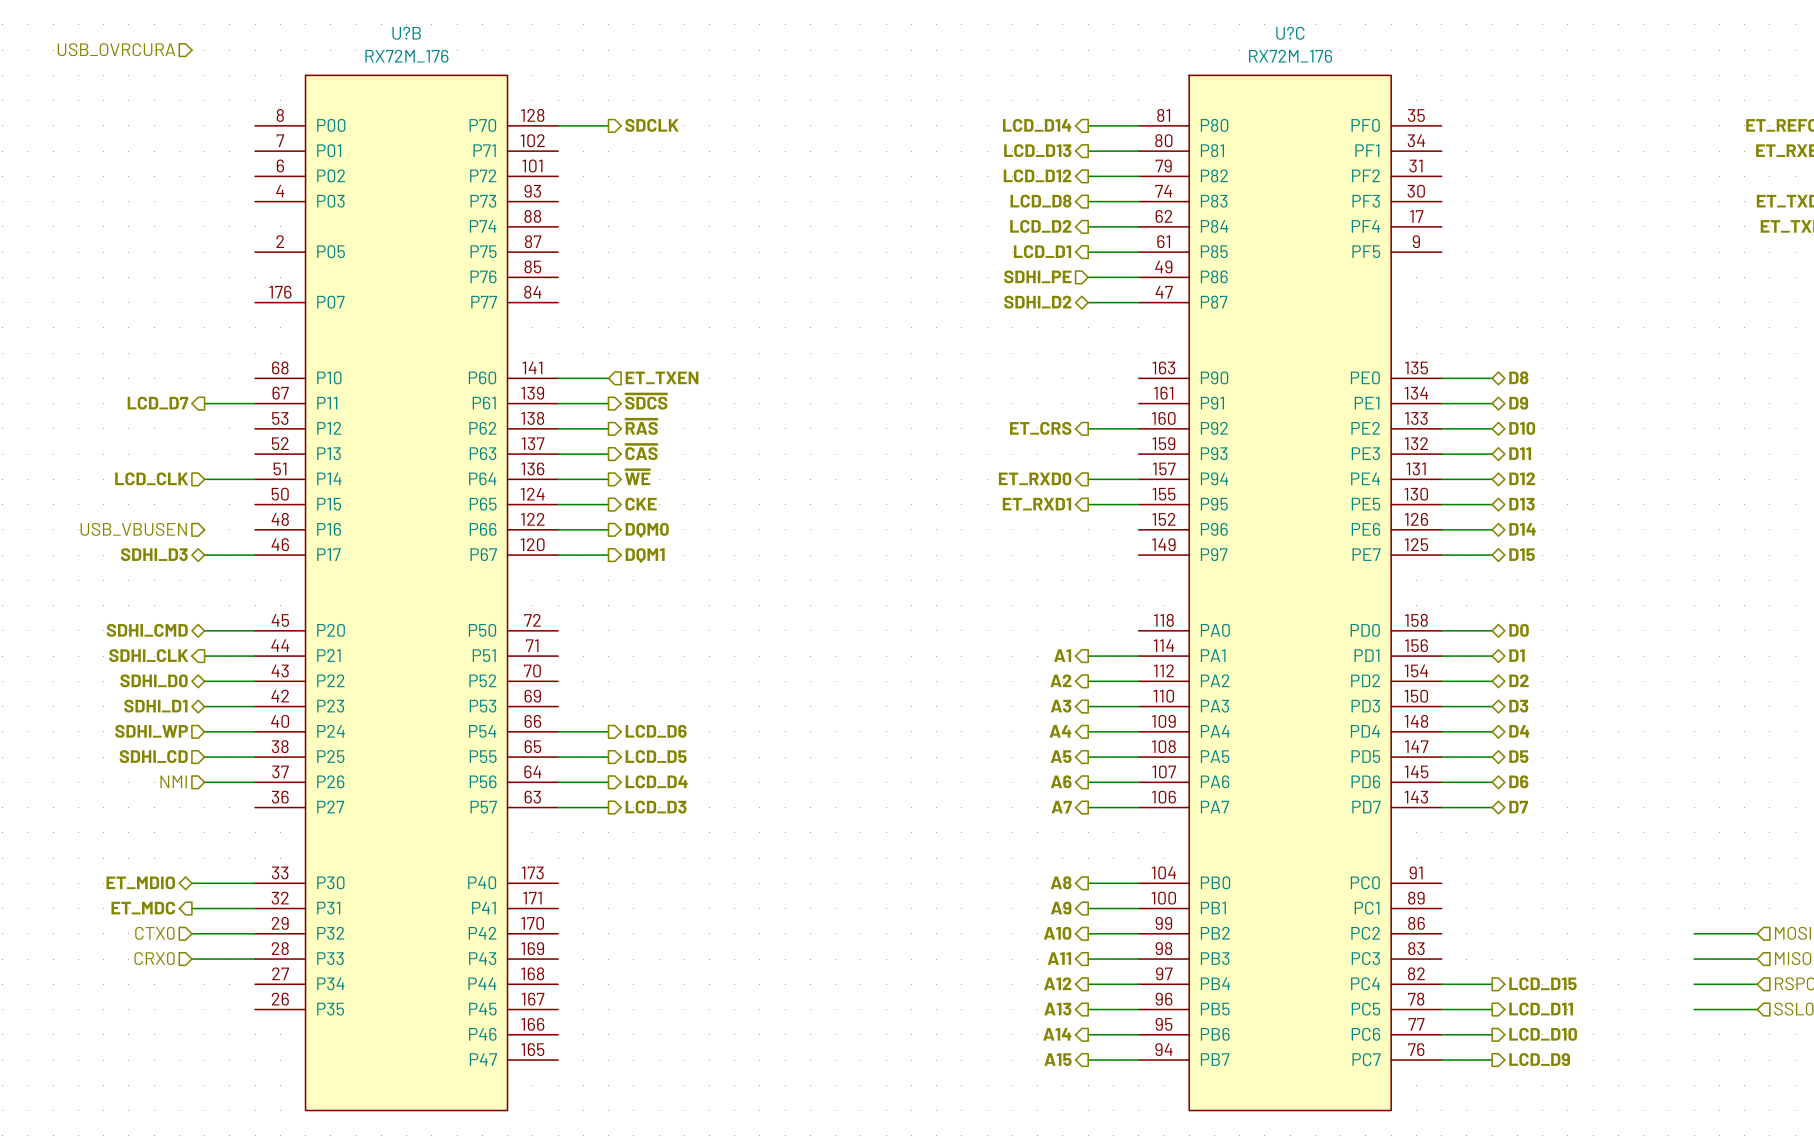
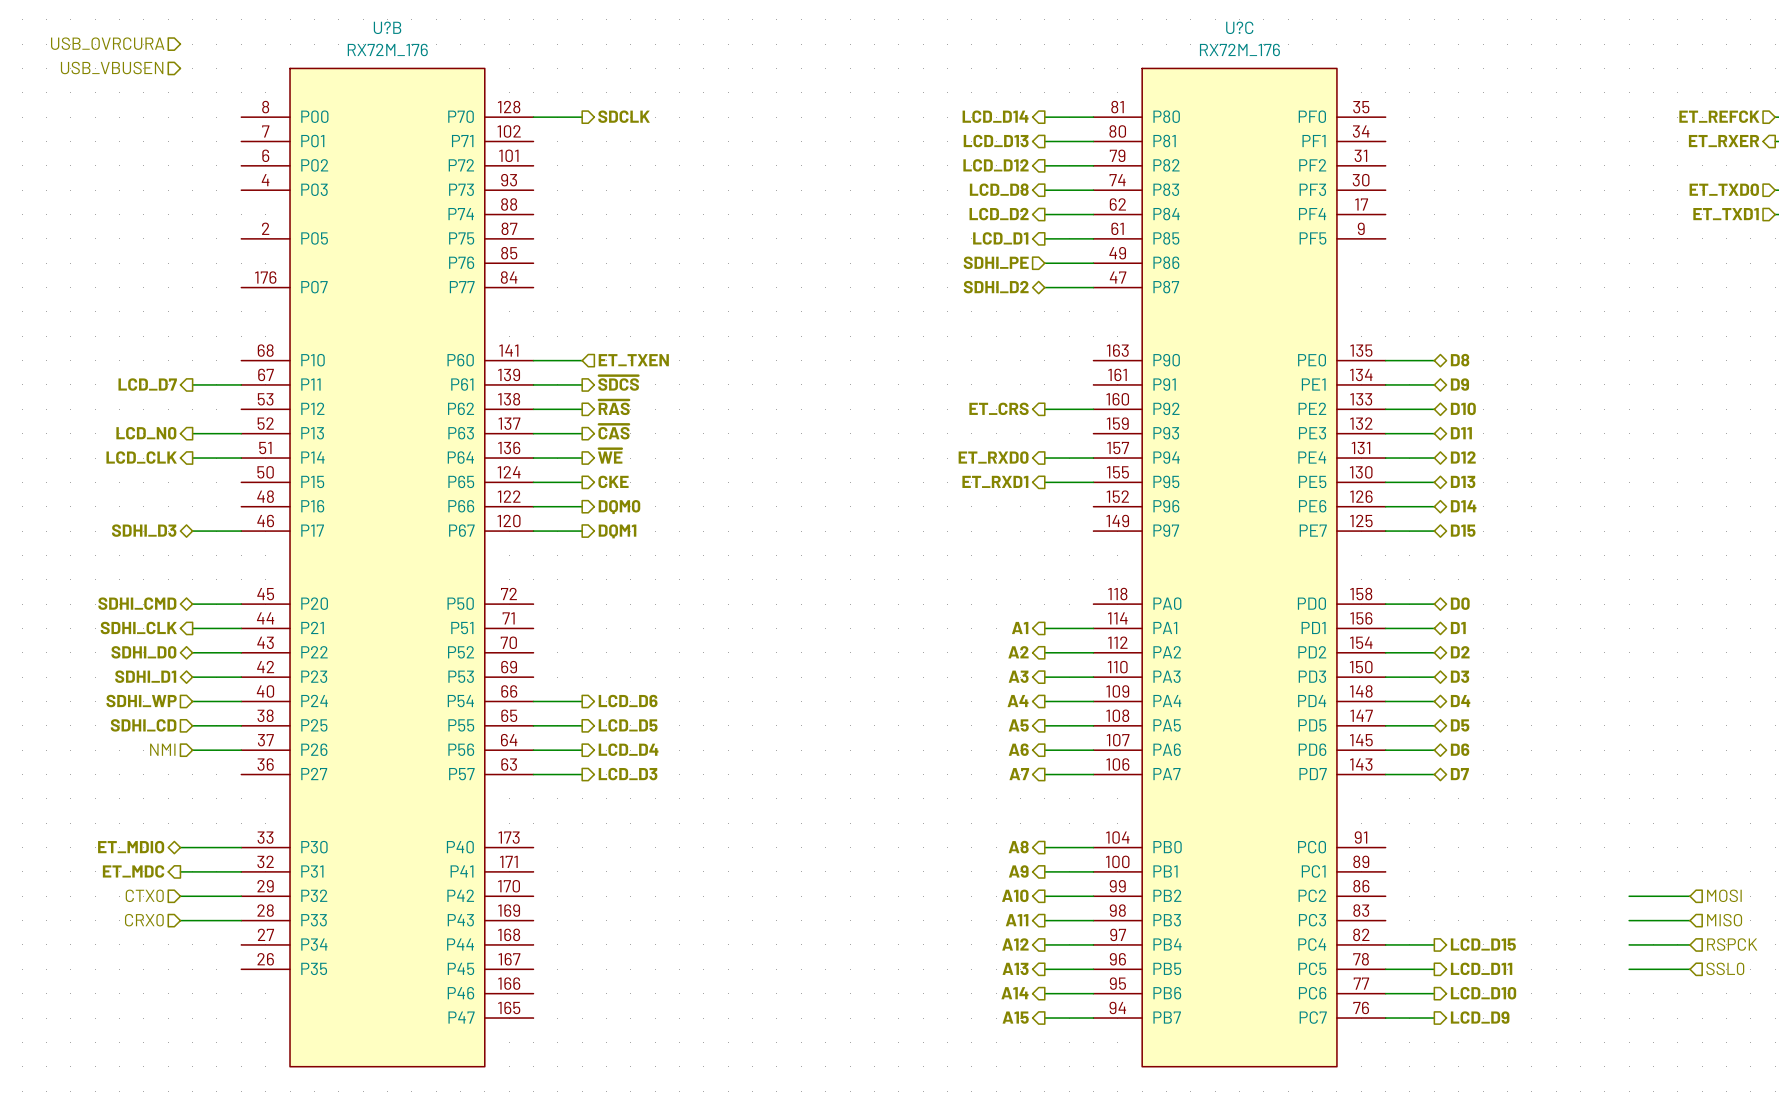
hierarchical label: none -> USB_VBUSEN (112, 68)
hierarchical label: none -> LCD_N0 (146, 433)
wire: none -> (192, 433) (241, 433)
hierarchical label shape: input (151, 478) -> output (141, 457)
hierarchical label: USB_VBUSEN (133, 529) -> none

